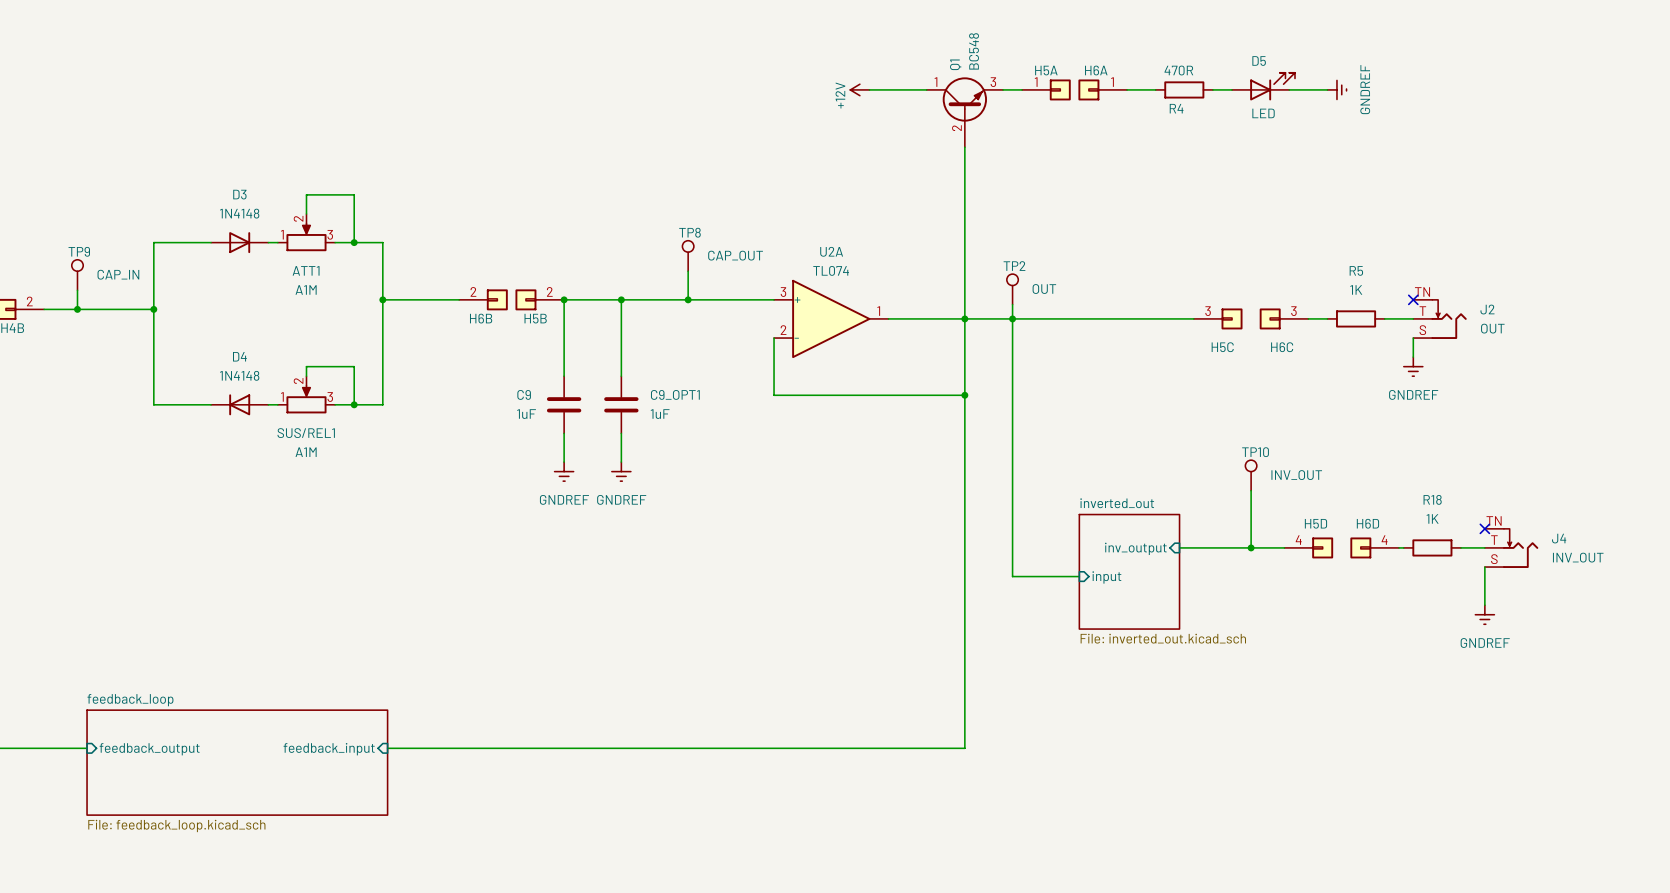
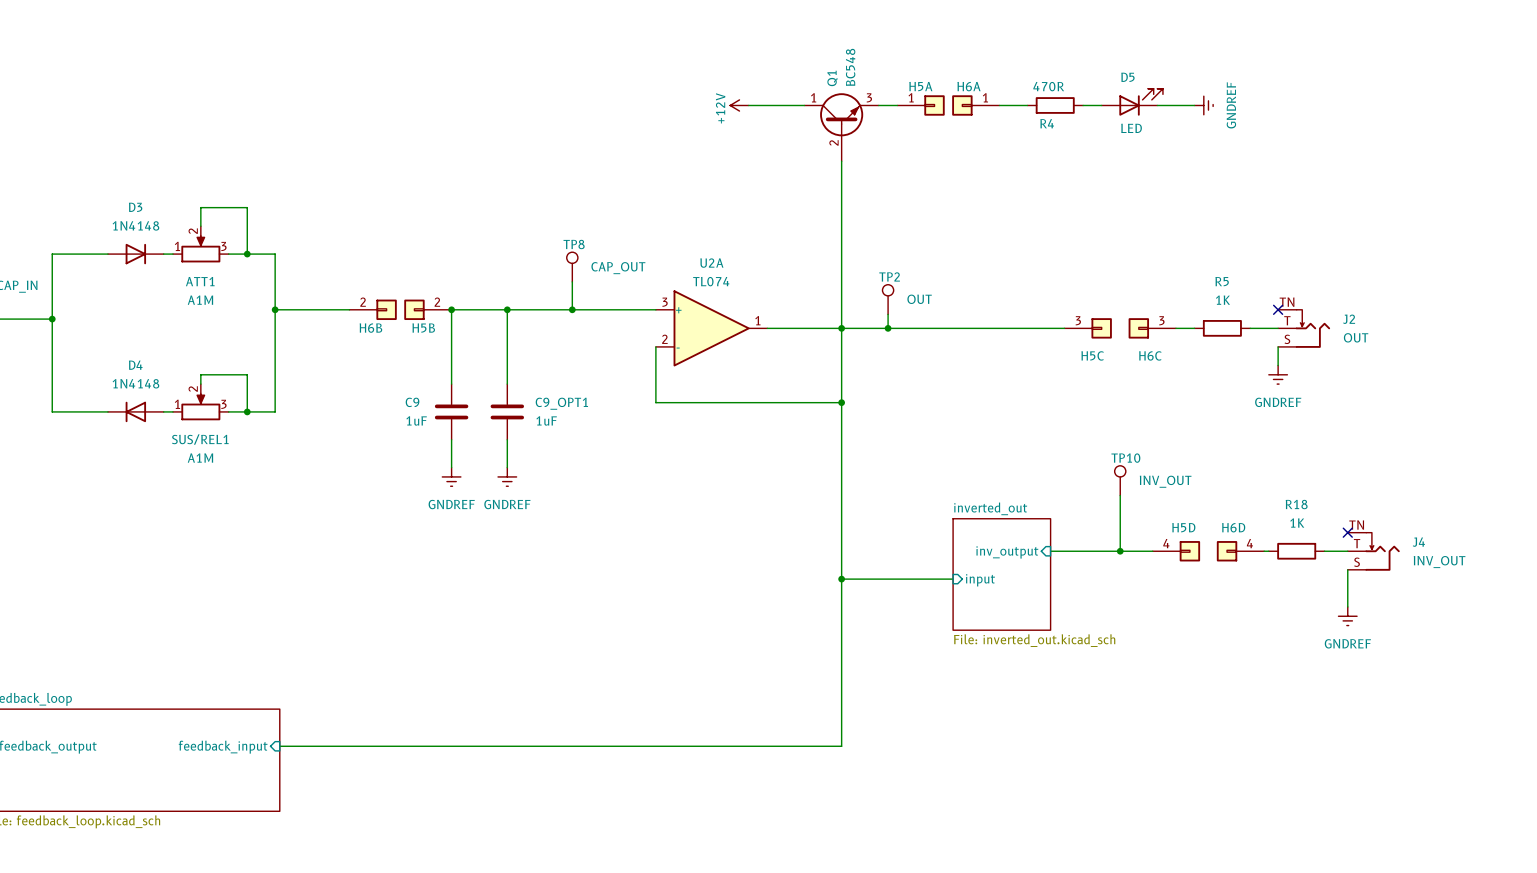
wire: (1012, 318) (1012, 576) -> (841, 579) (888, 579)
junction: none -> (841, 579)

